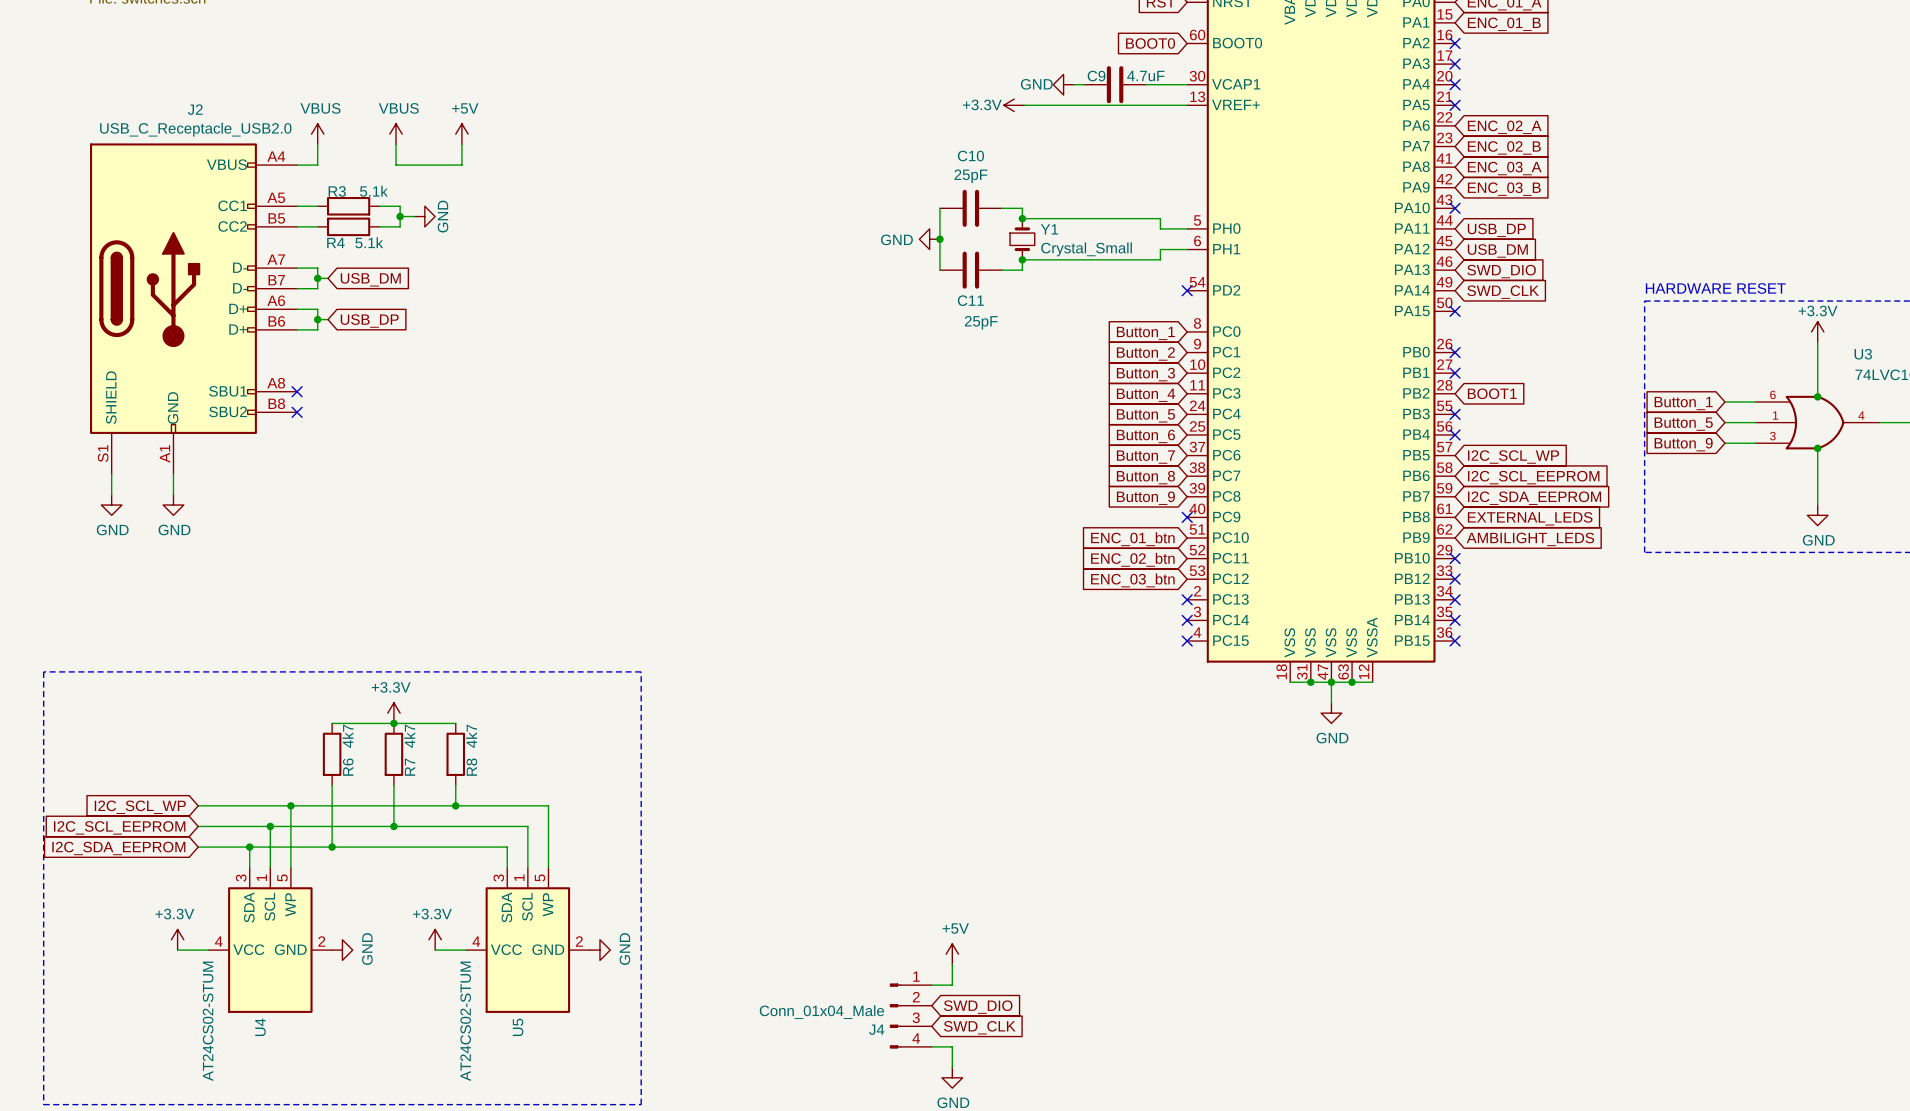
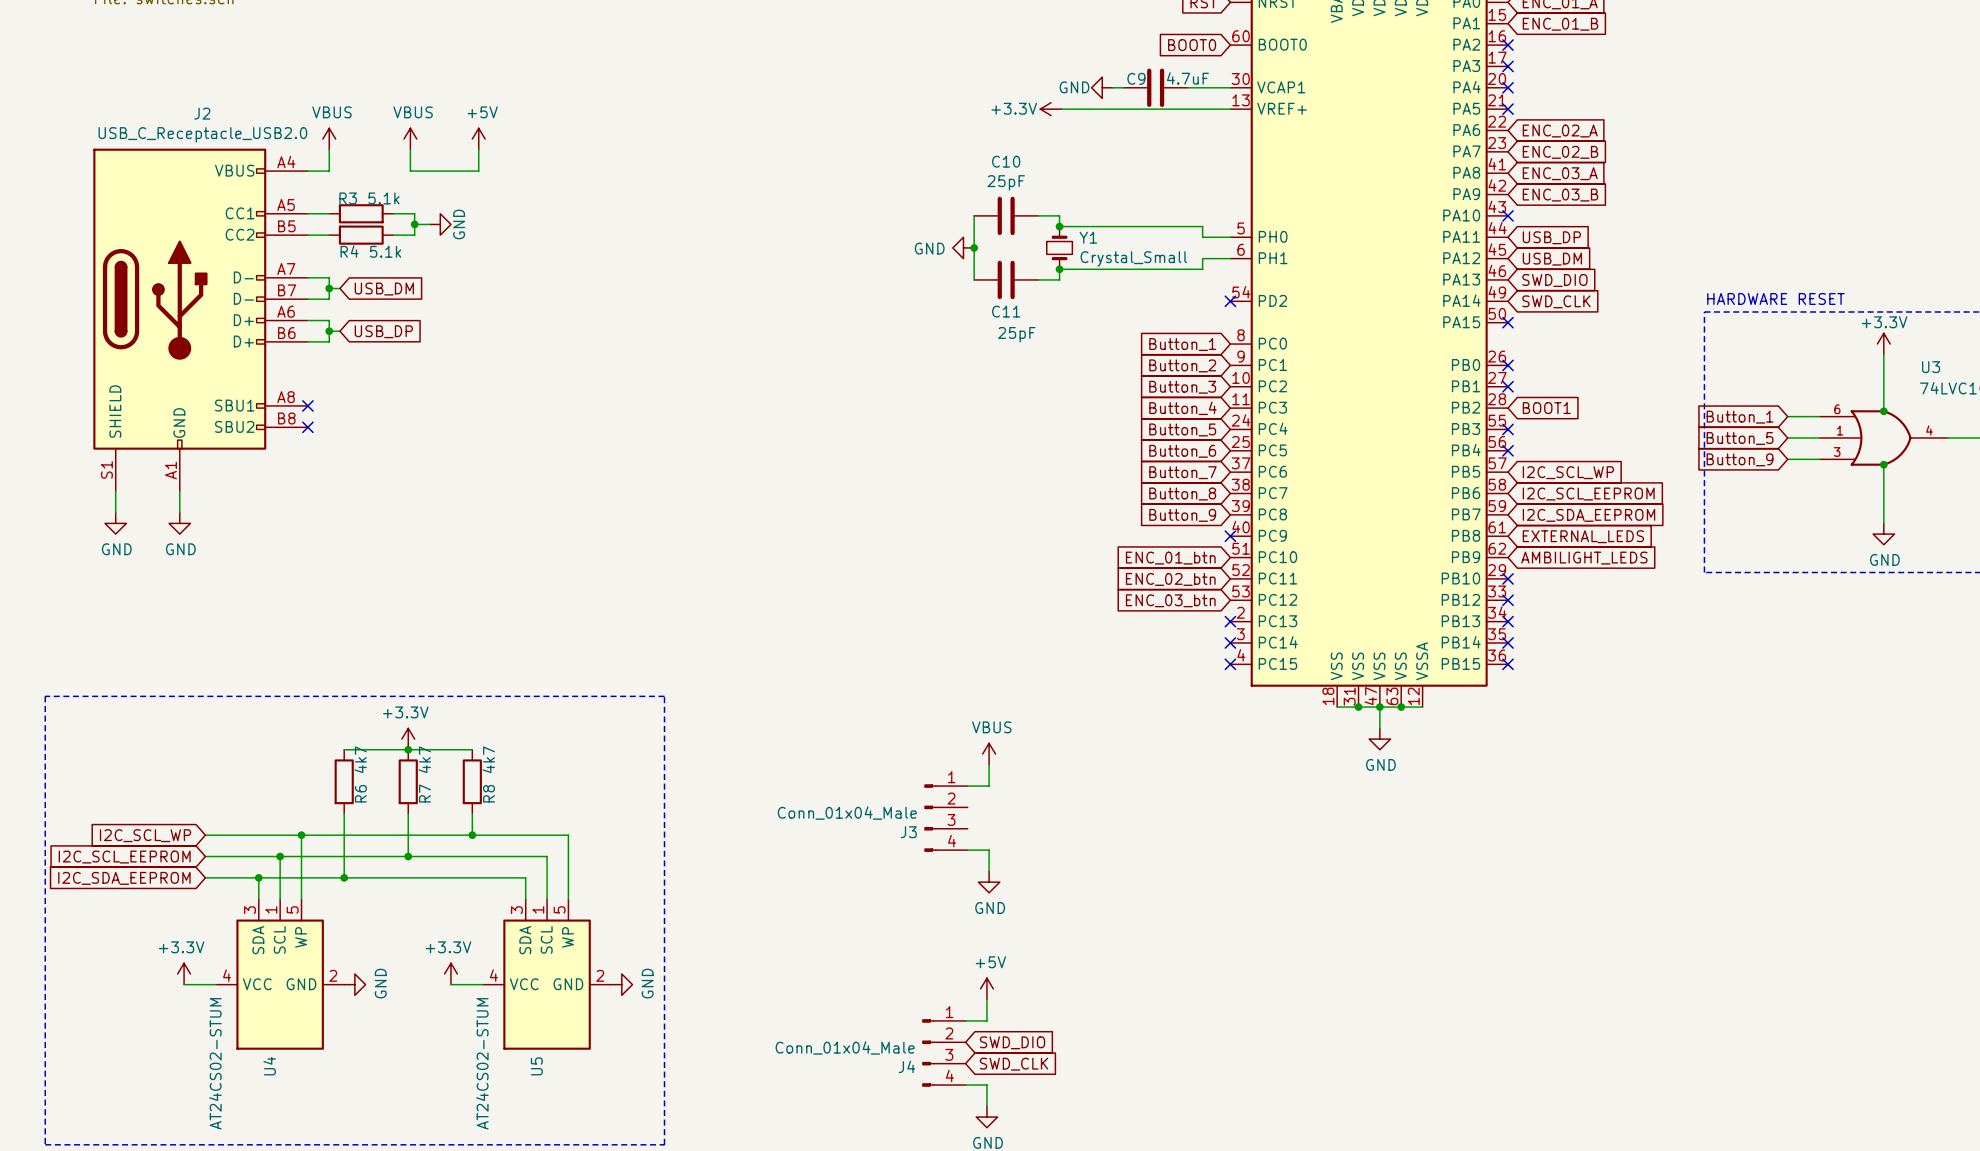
power symbol: none -> VBUS (989, 754)
wire: none -> (989, 764) (989, 786) (967, 786)
J3: none -> Conn_01x04_Male (946, 818)
wire: none -> (967, 850) (989, 850) (989, 871)
power symbol: none -> GND (989, 882)

